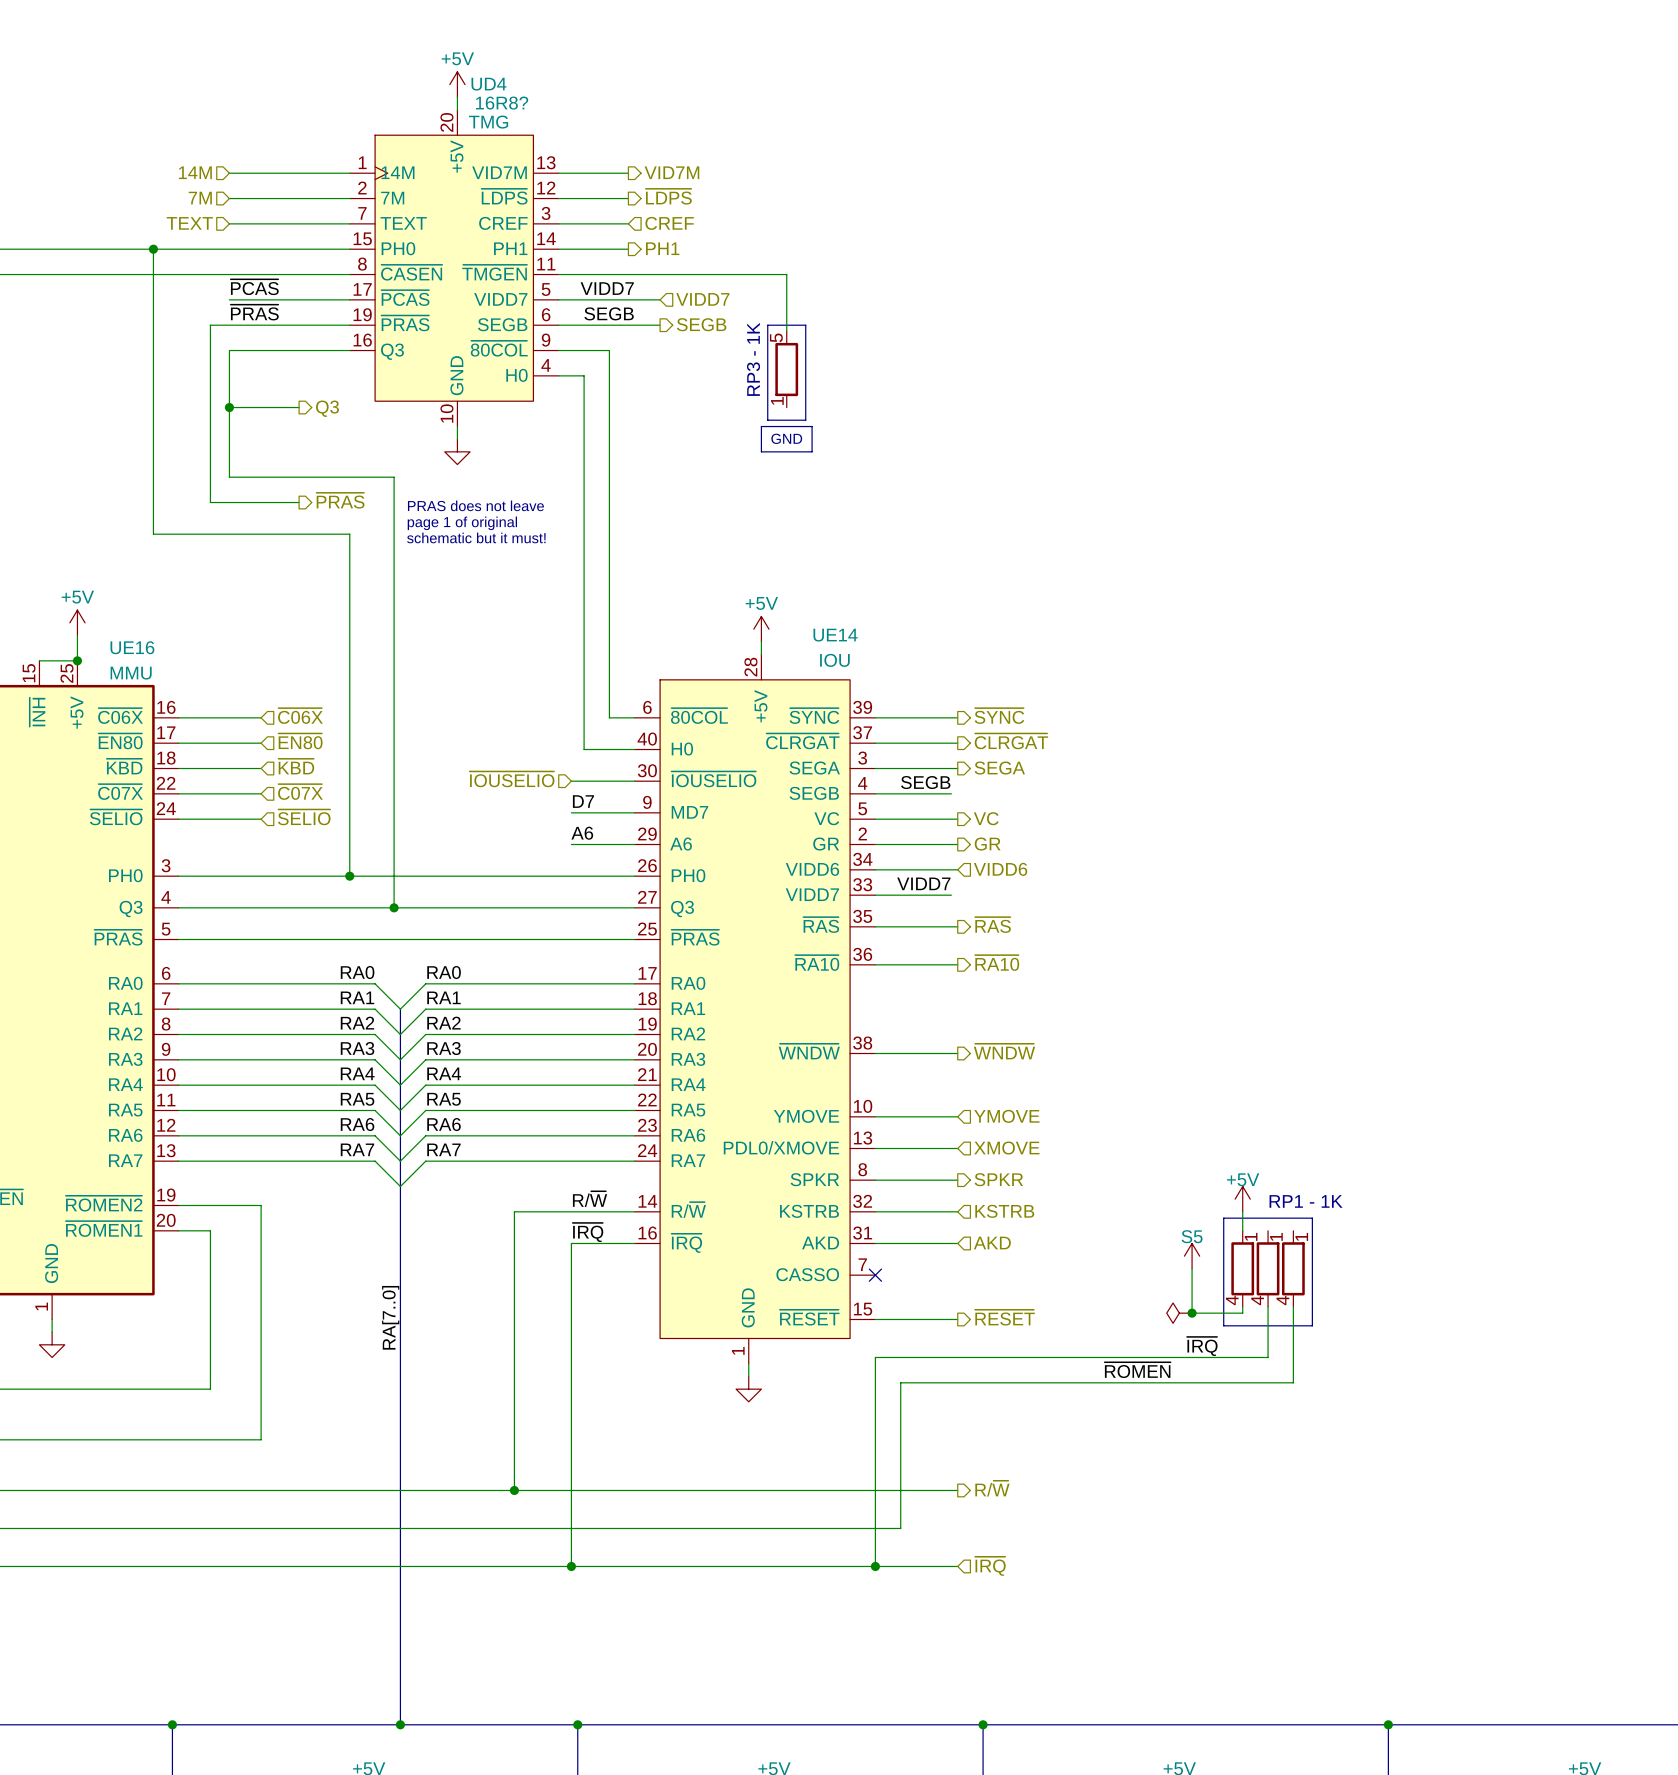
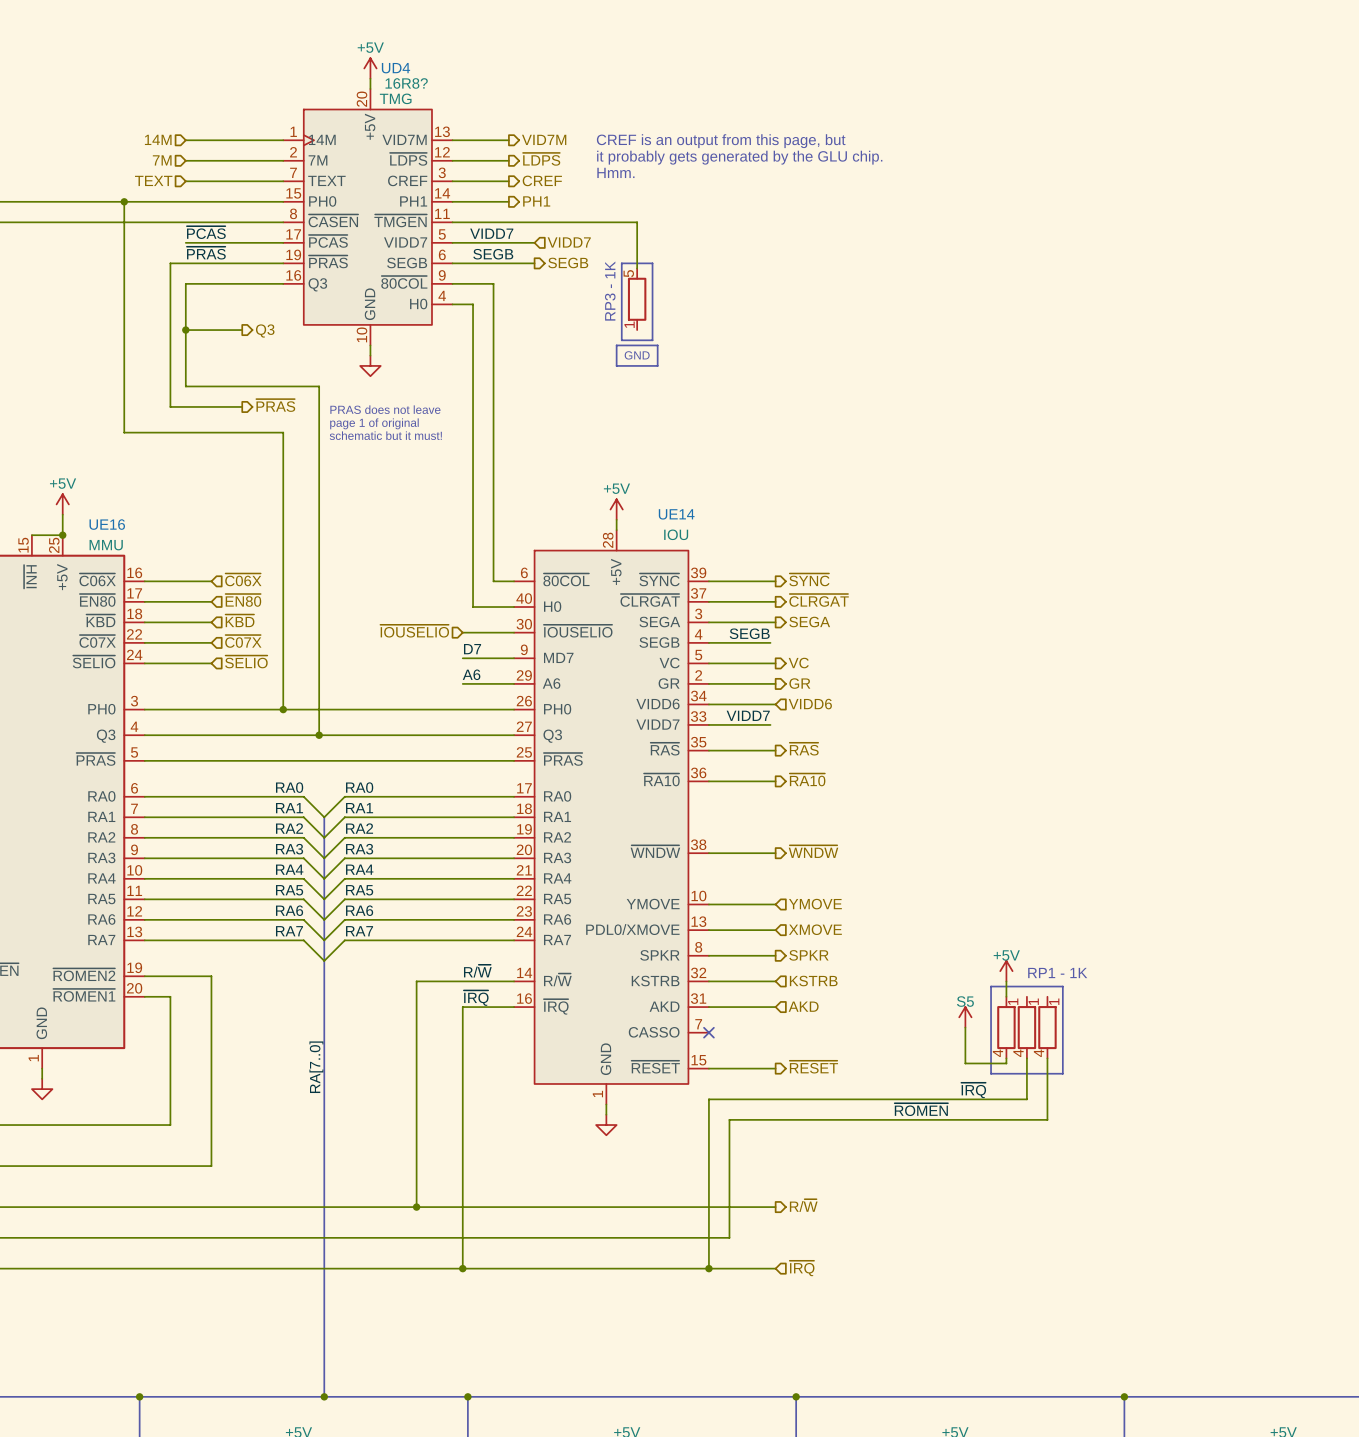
text: none -> CREF is an output from this page, but (721, 141)
text: none -> it probably gets generated by the GLU chip. (739, 157)
text: none -> Hmm. (615, 172)
hierarchical label shape: input (669, 223) -> output (542, 180)
power symbol: (1179, 1313) -> none
junction: (1192, 1313) -> none

